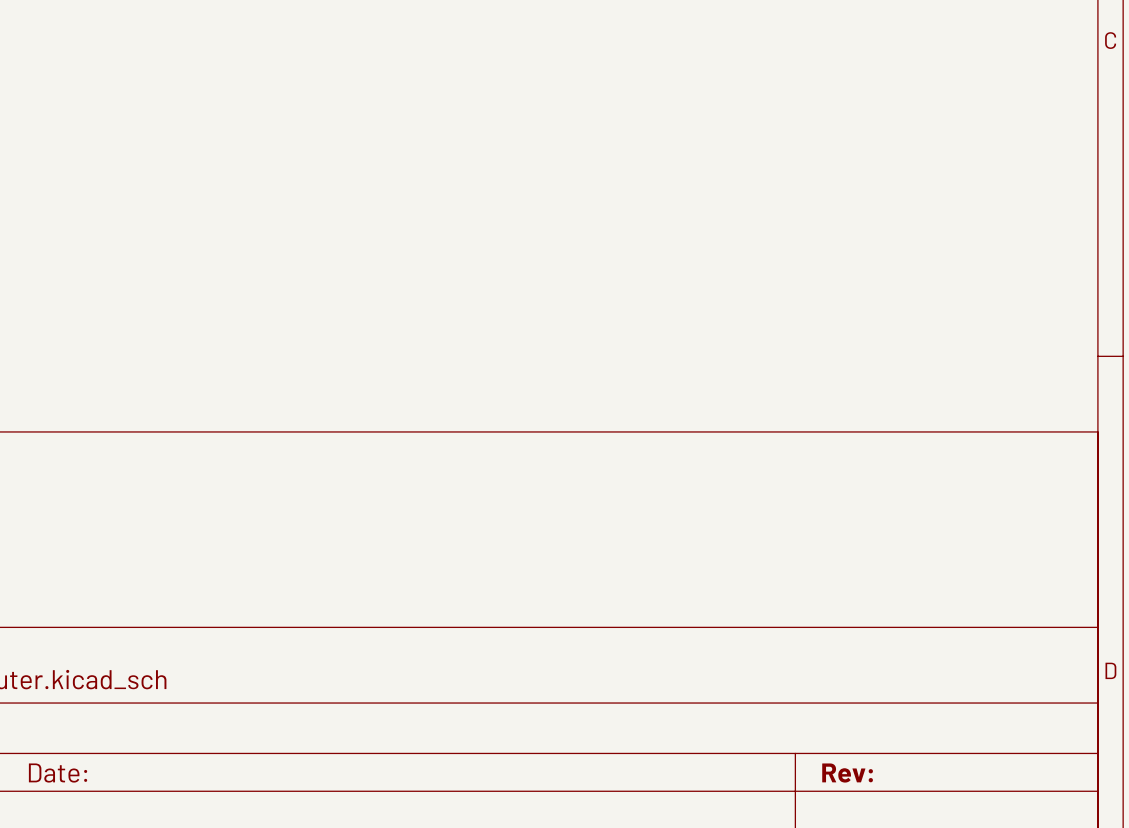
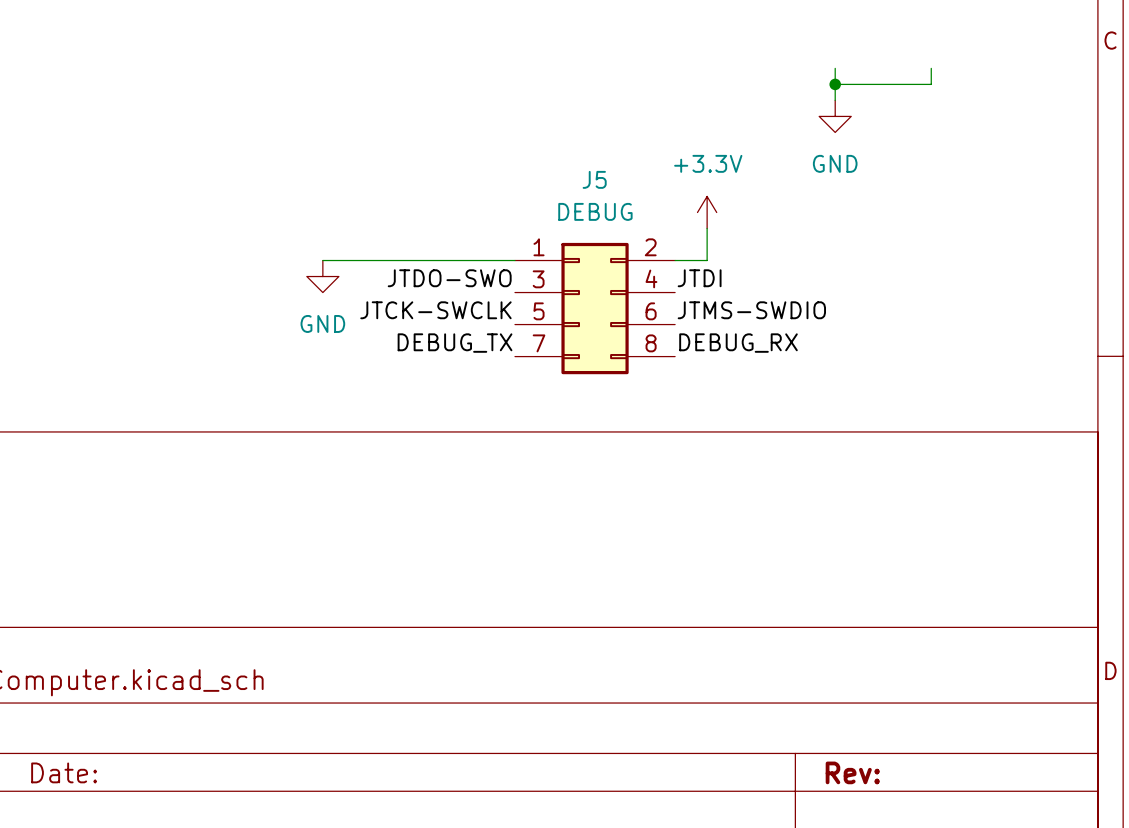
wire: none -> (835, 68) (835, 100)
wire: none -> (931, 68) (931, 84) (835, 84)
junction: none -> (835, 84)
power symbol: none -> GND (835, 116)
power symbol: none -> +3.3V (707, 212)
wire: none -> (707, 228) (707, 260) (675, 260)
wire: none -> (322, 260) (514, 260)
power symbol: none -> GND (322, 276)
label: none -> JTDO-SWO (449, 278)
label: none -> JTDI (699, 278)
J5: none -> DEBUG (595, 308)
label: none -> JTCK-SWCLK (435, 310)
label: none -> JTMS-SWDIO (751, 310)
label: none -> DEBUG_TX (455, 343)
label: none -> DEBUG_RX (738, 343)

